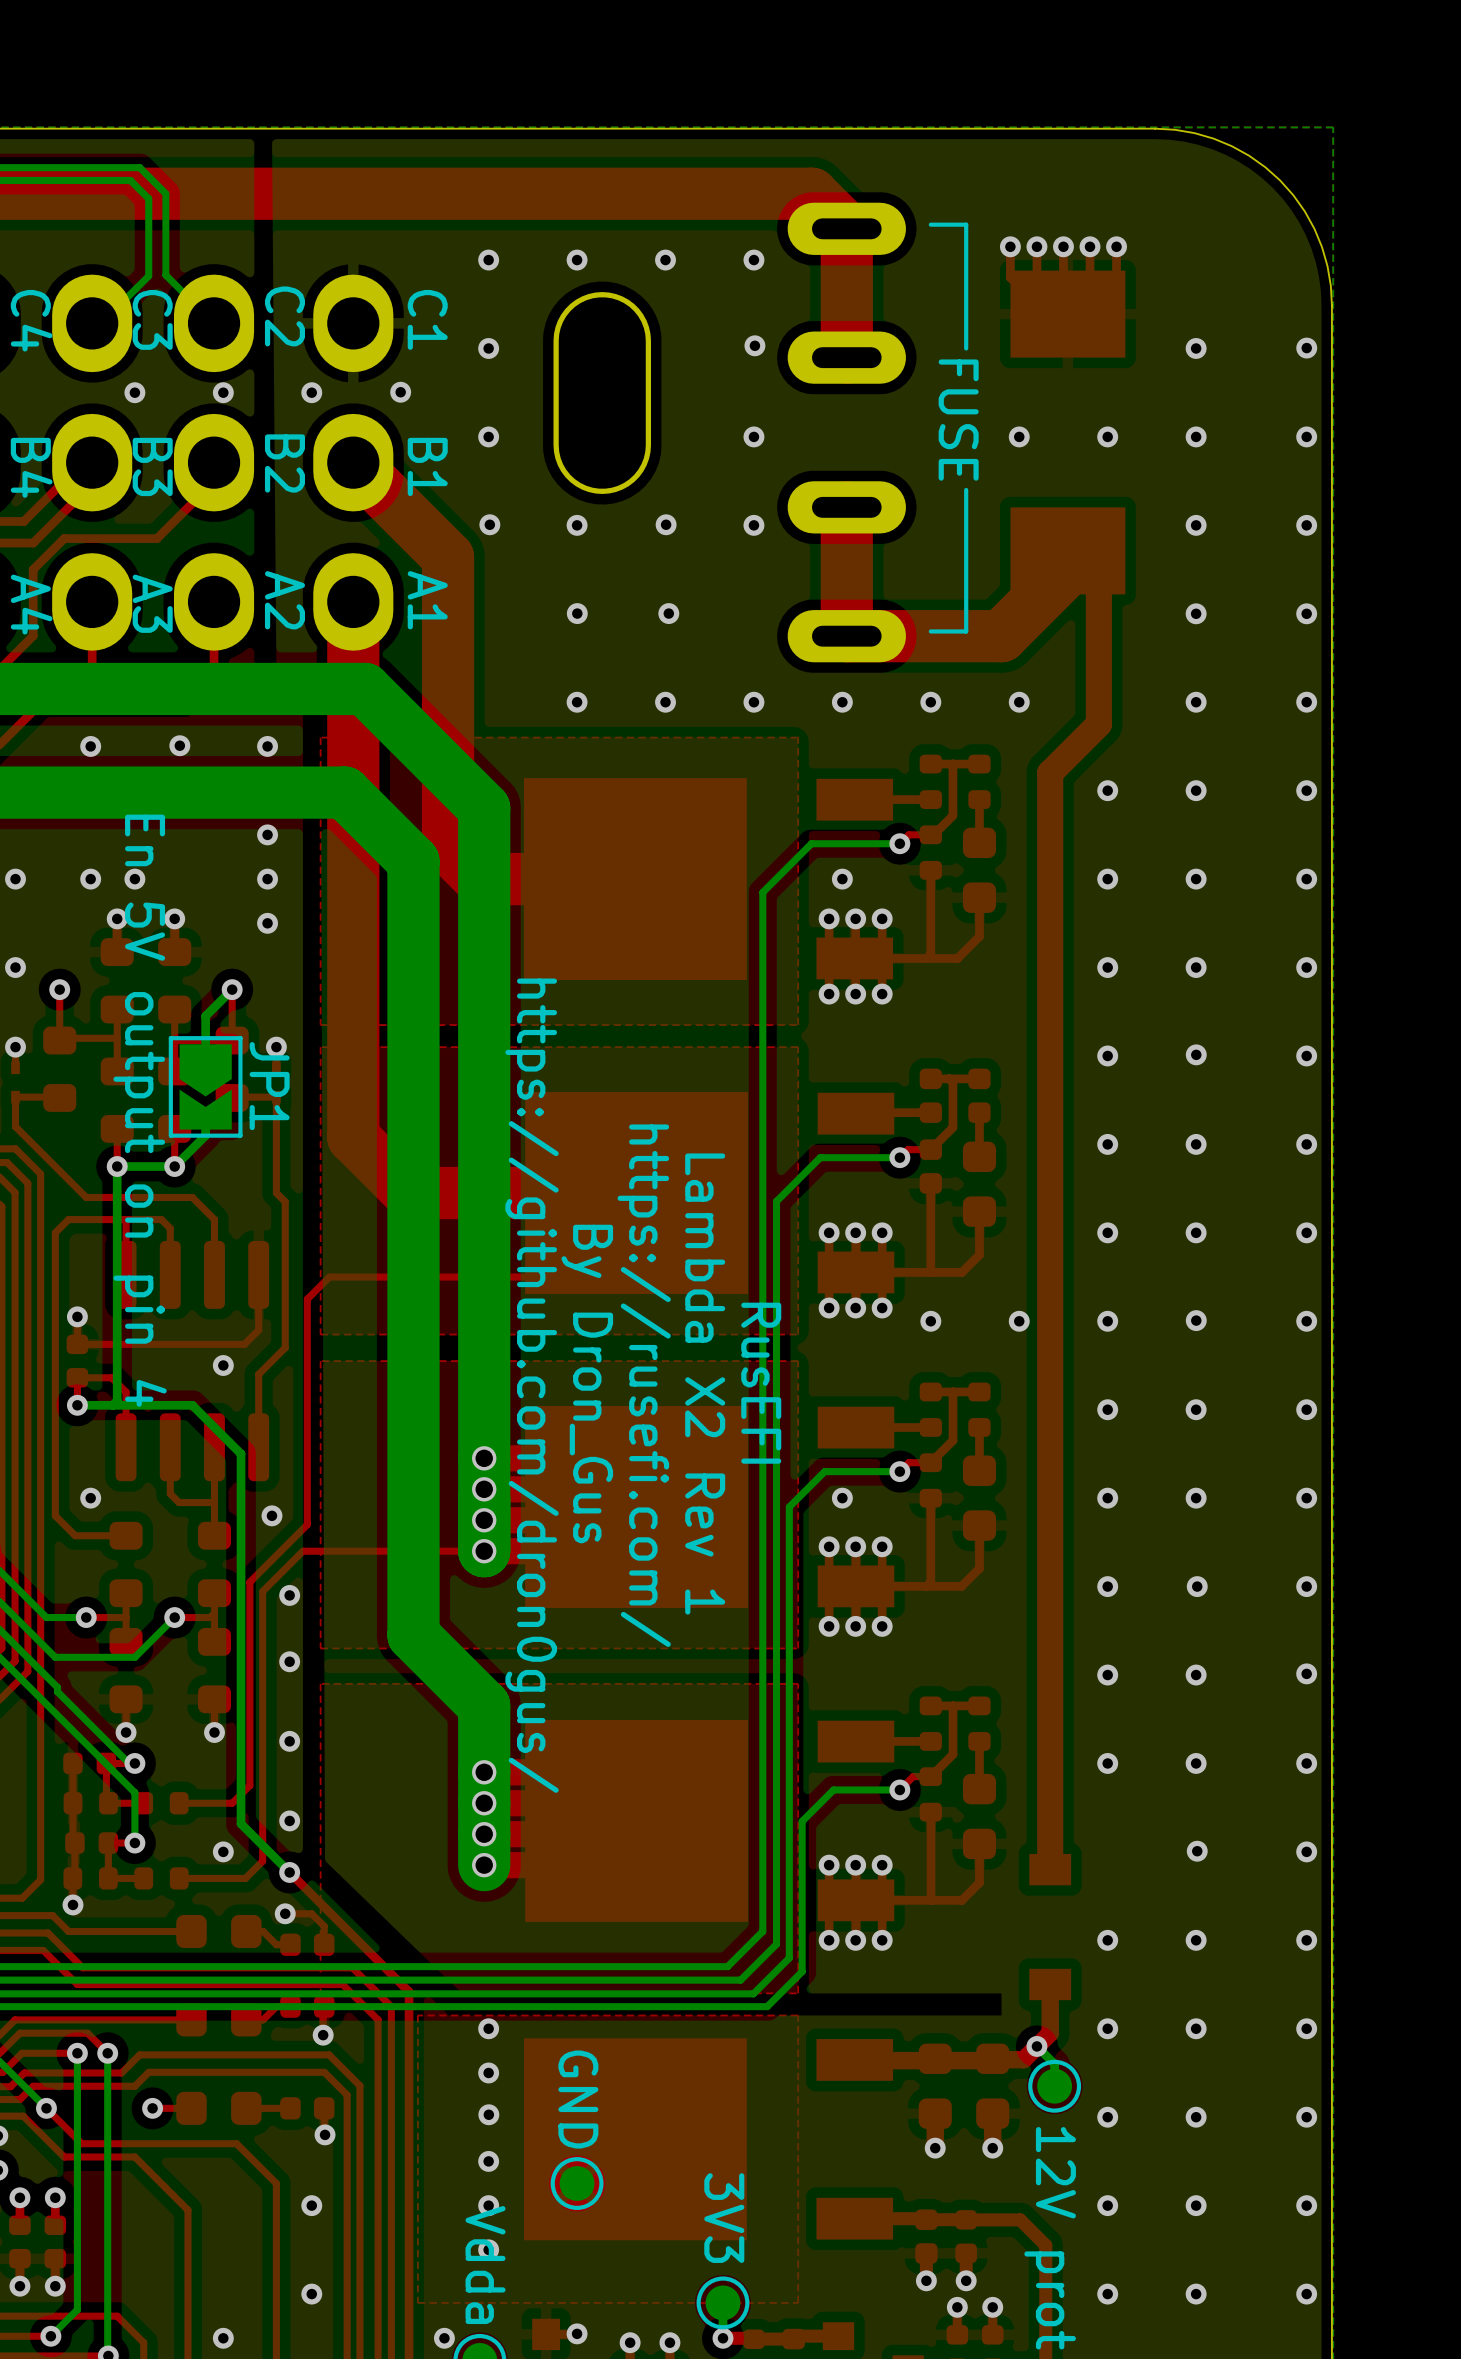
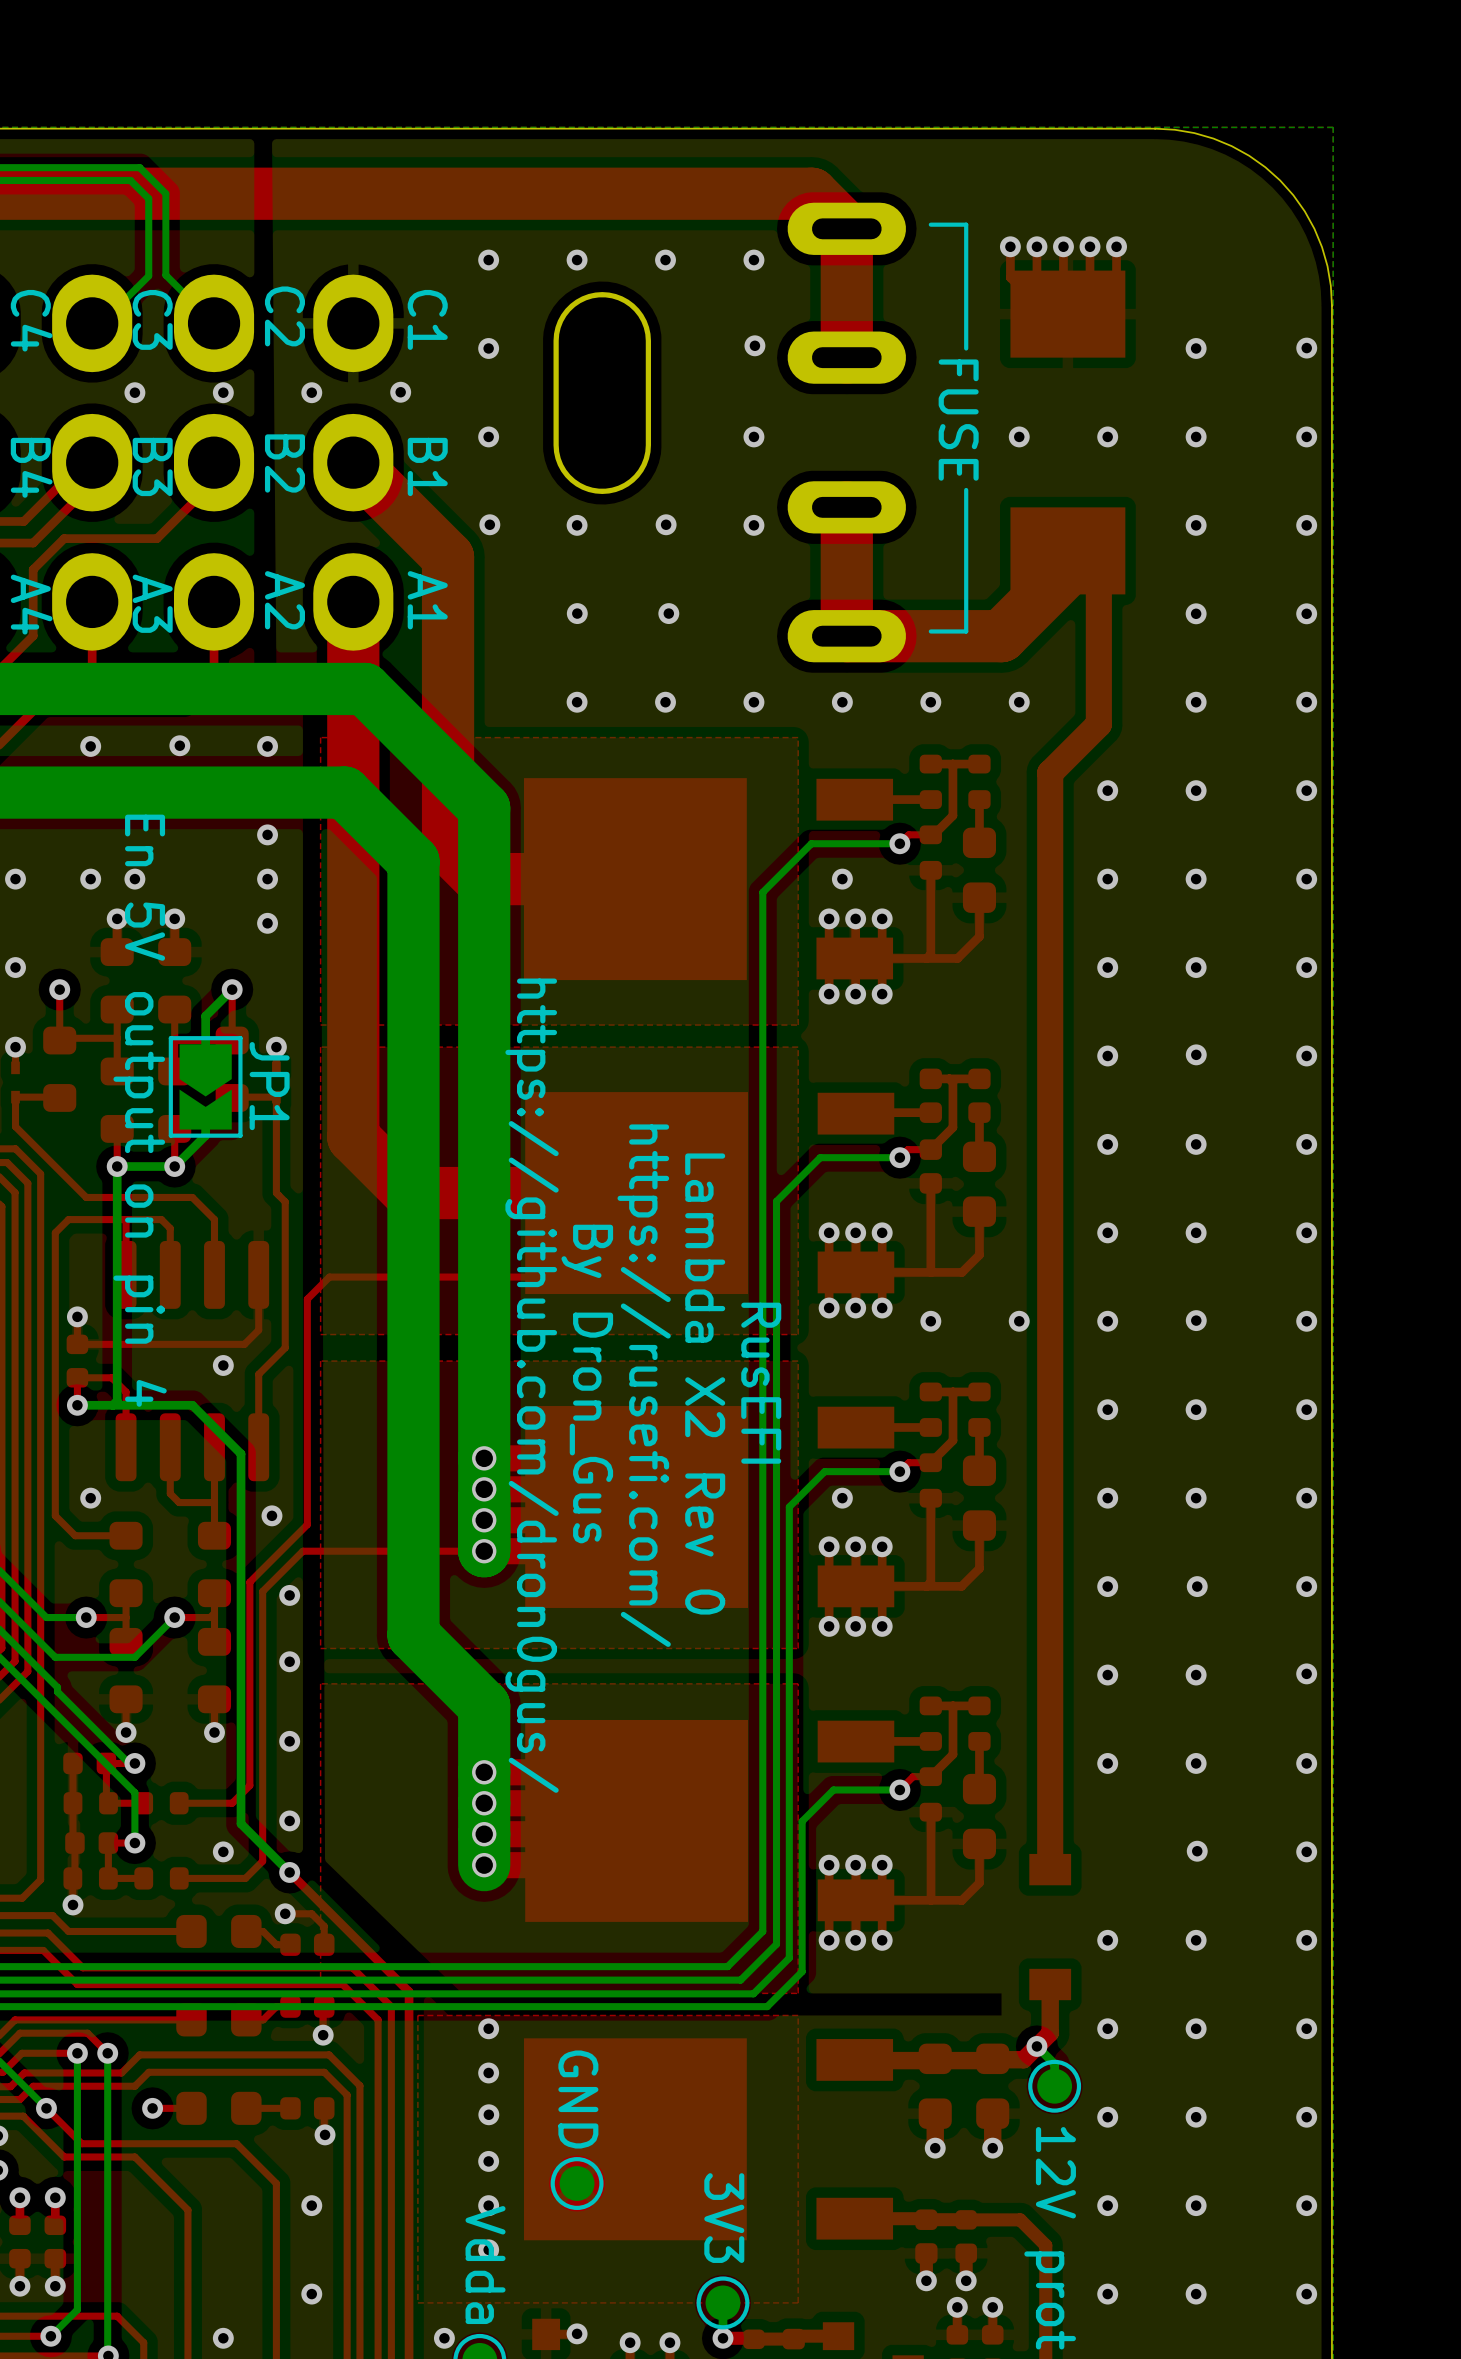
text: Lambda X2 Rev 1 (705, 1384) -> Lambda X2 Rev 0 (705, 1384)

